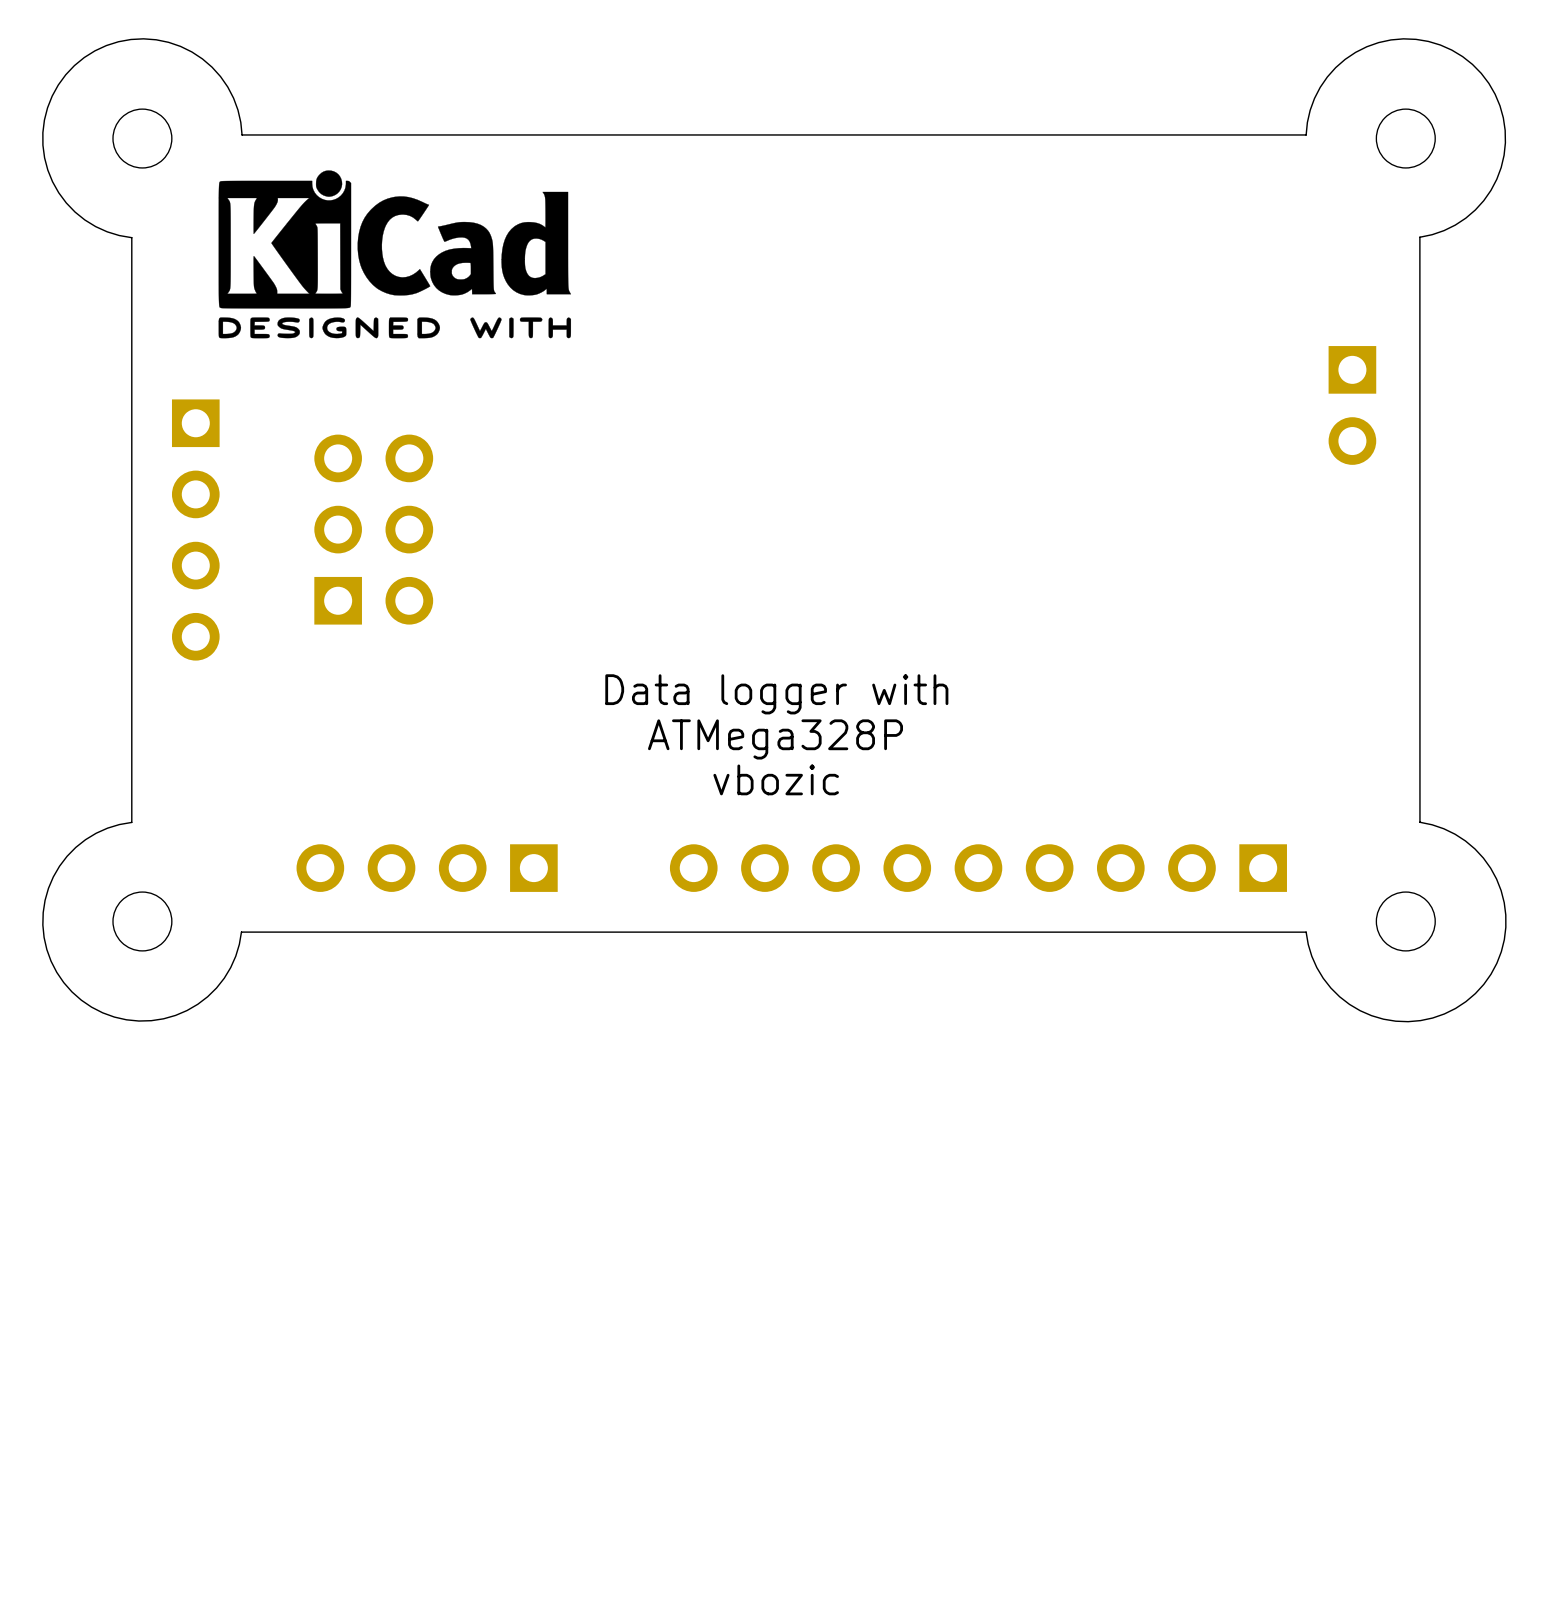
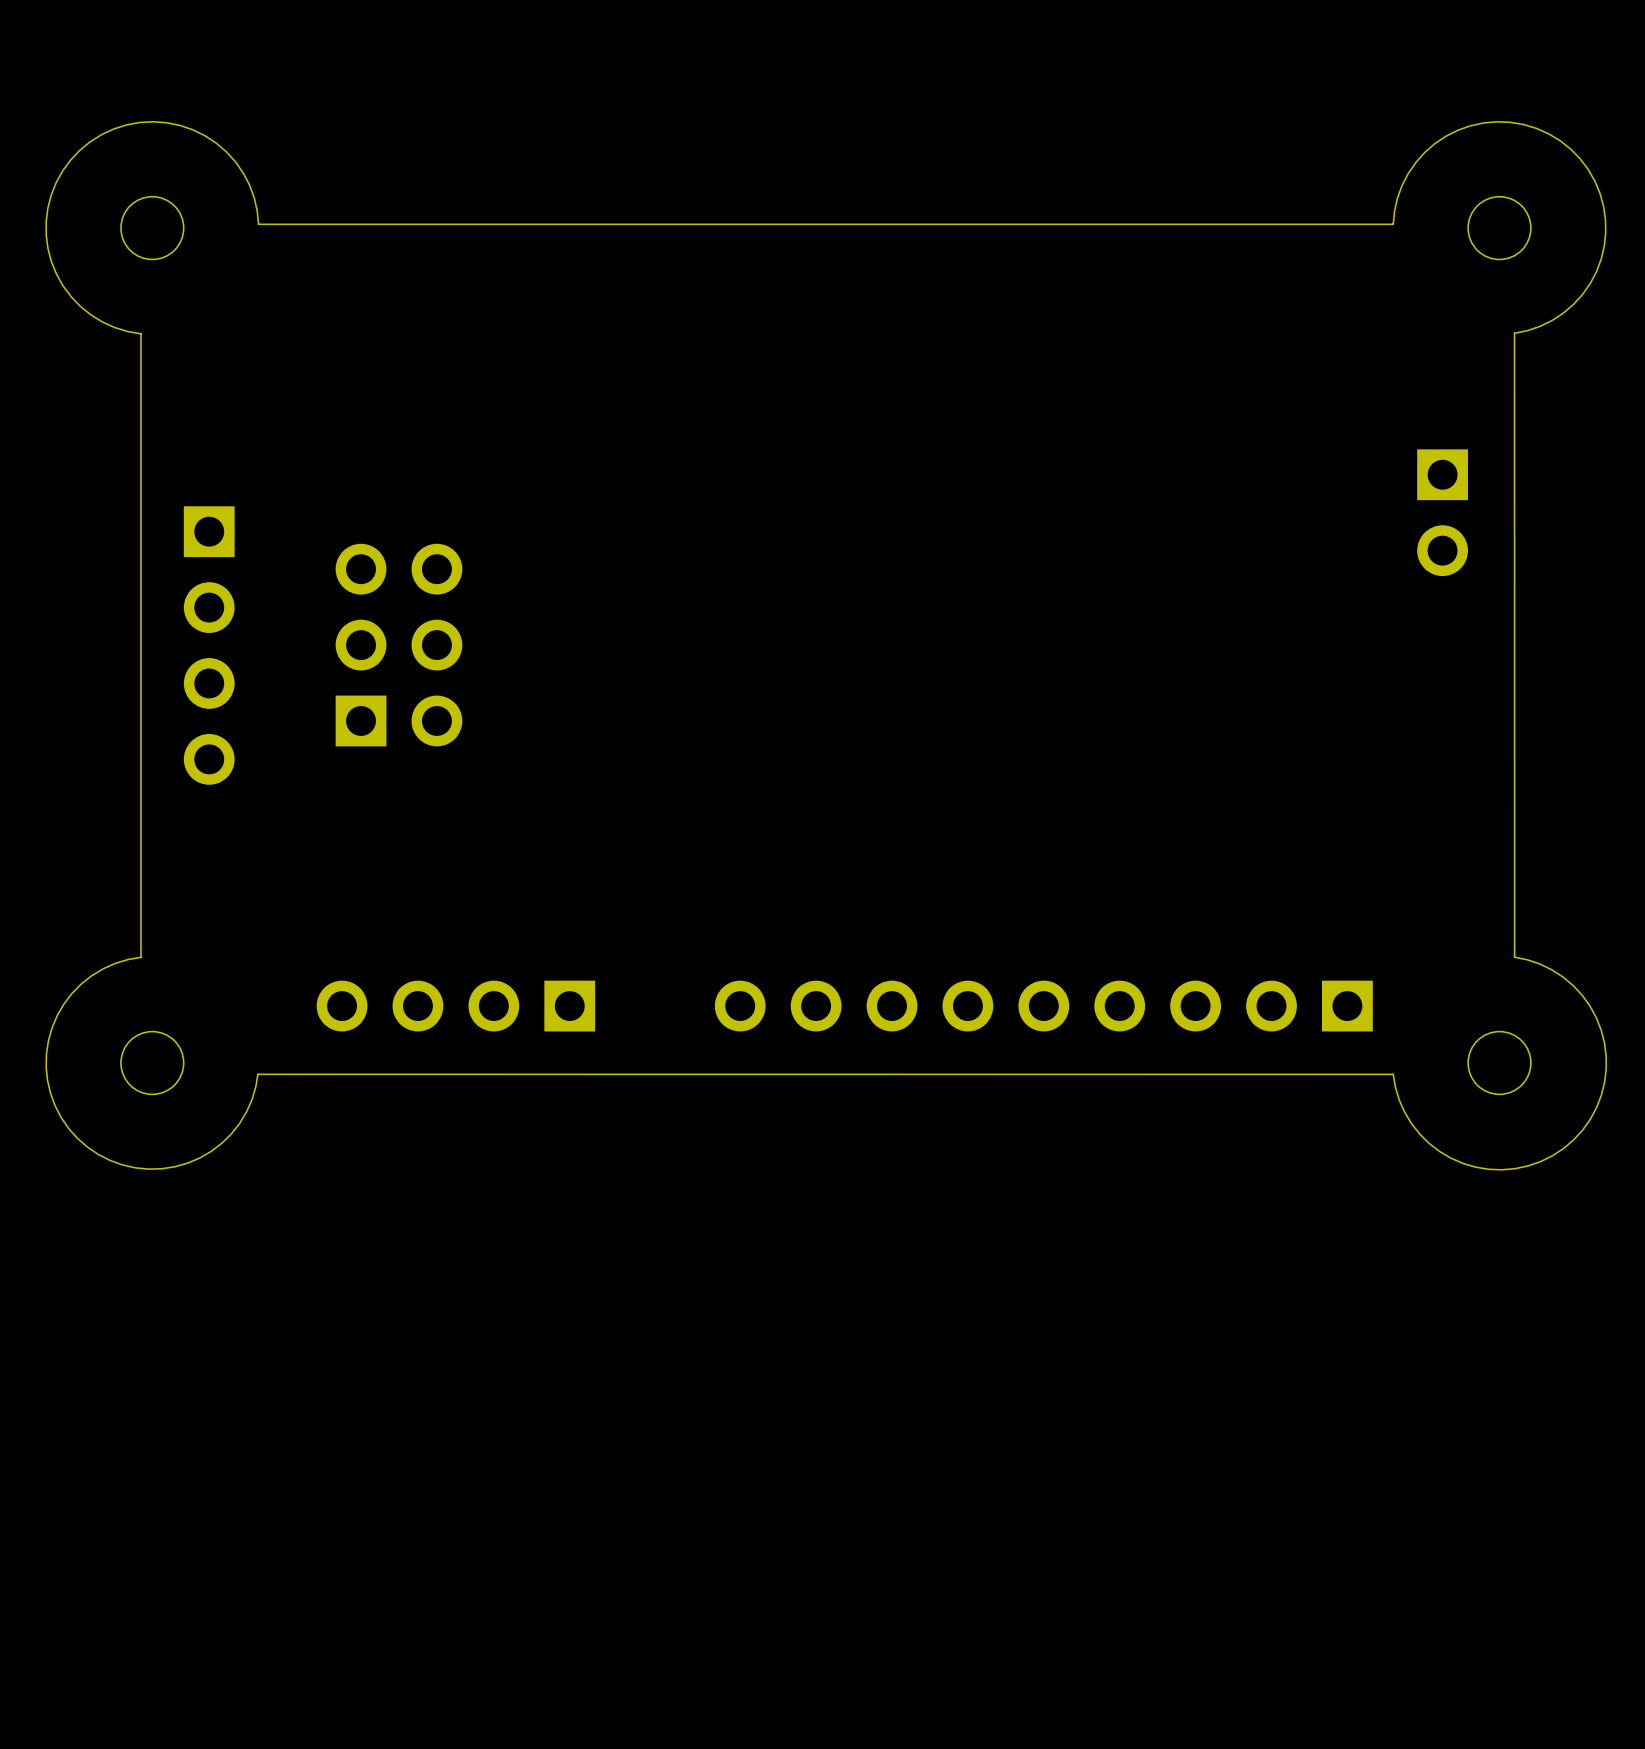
drawing: [218, 170, 572, 339] -> none
text: Data logger with (776, 694) -> none
text: ATMega328P (775, 739) -> none
text: vbozic (776, 779) -> none

